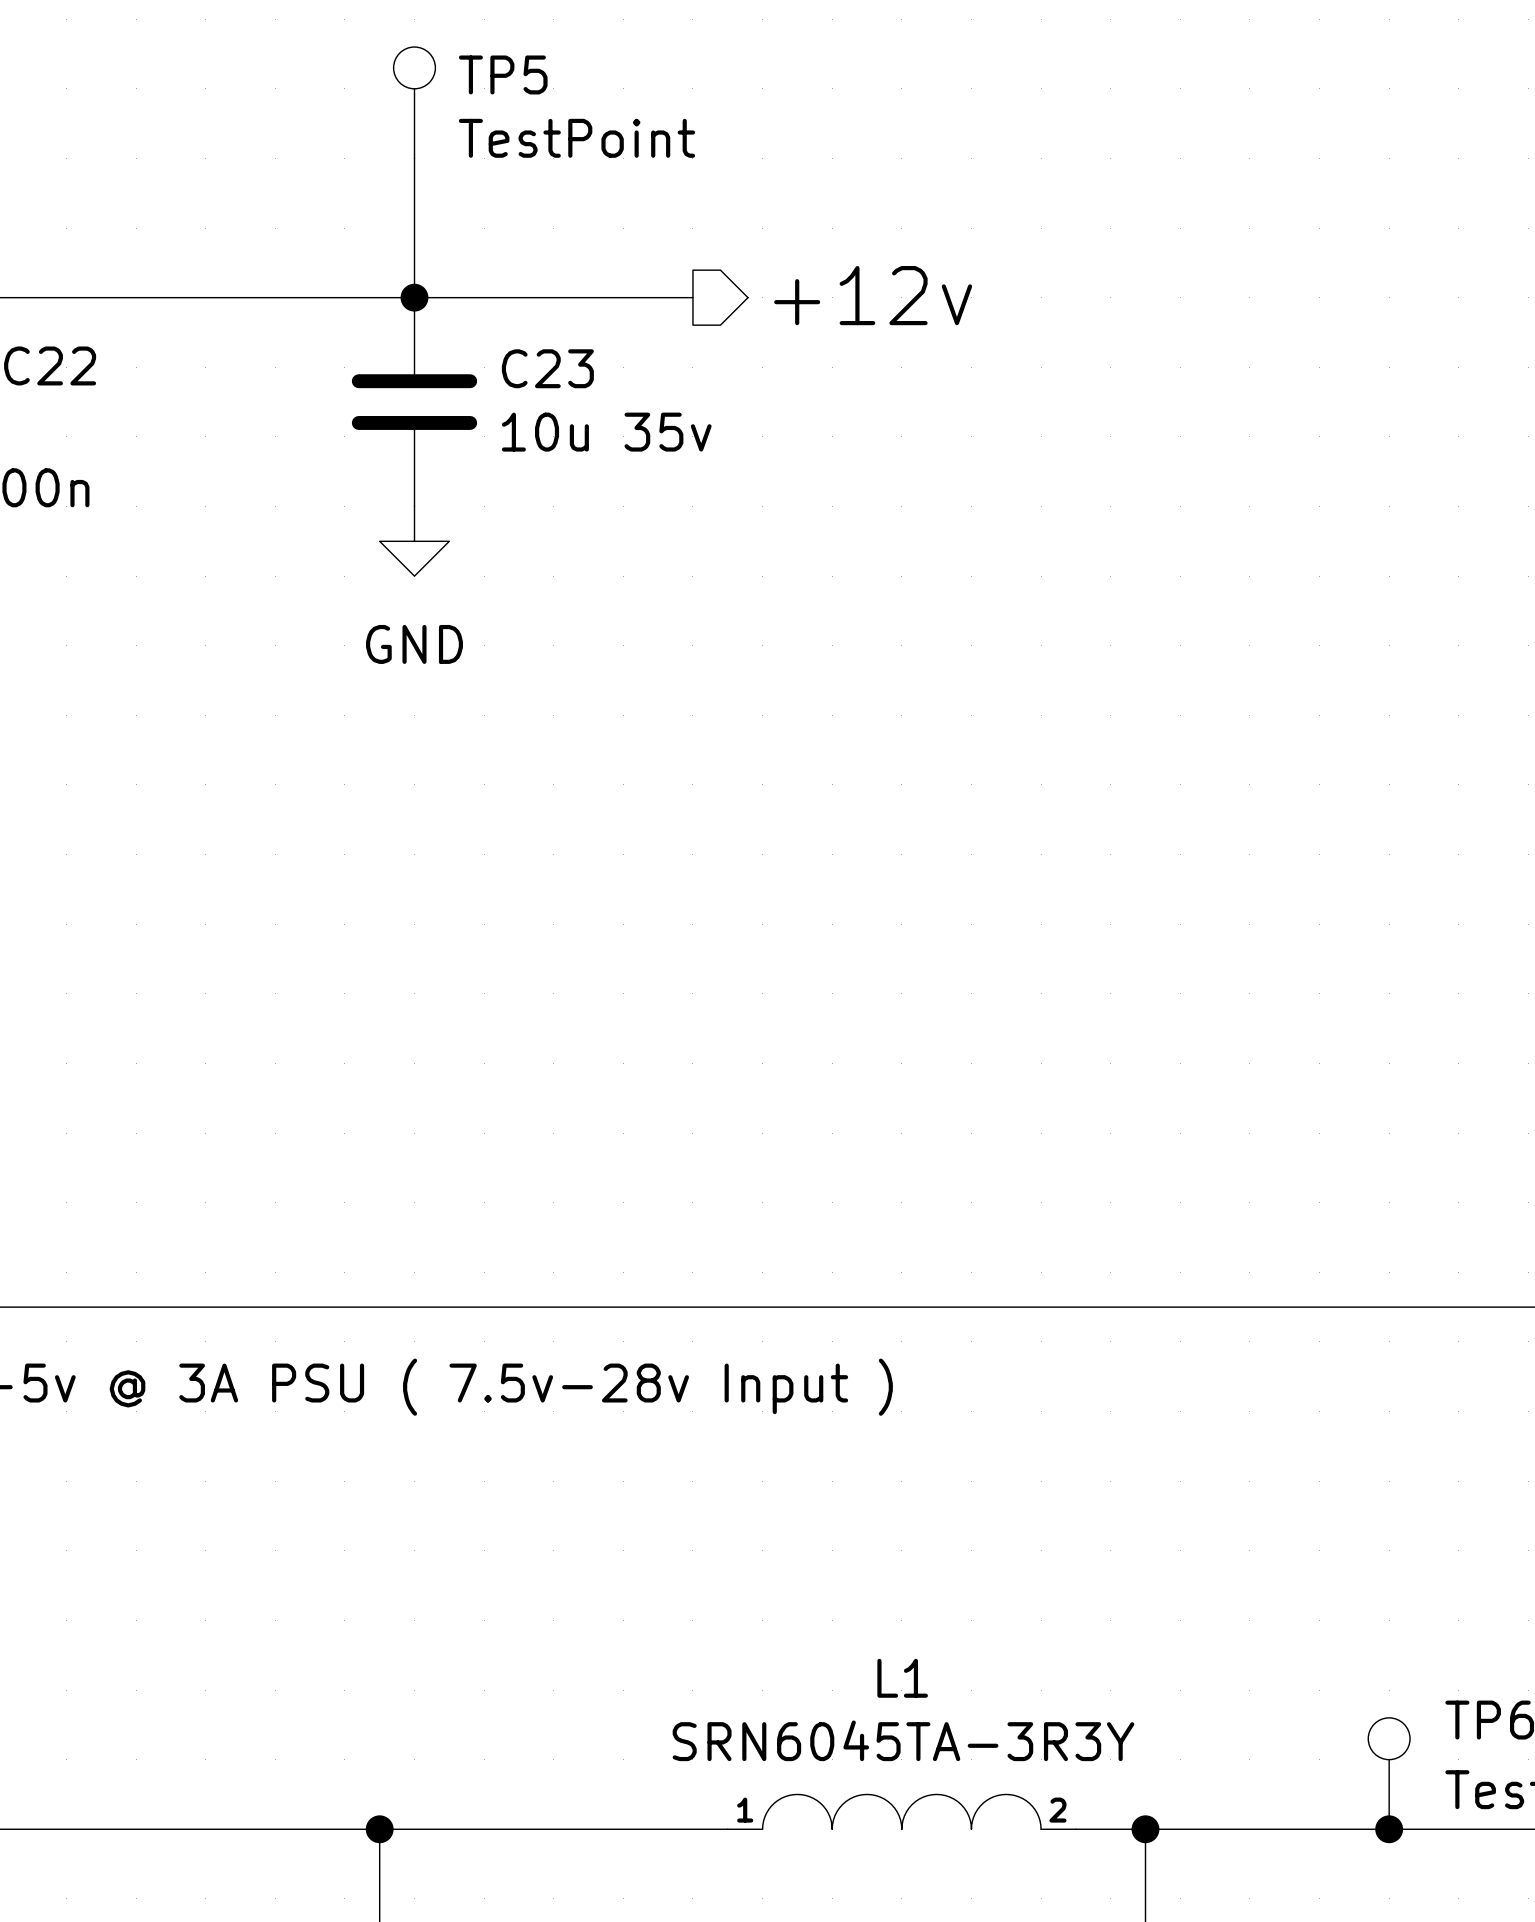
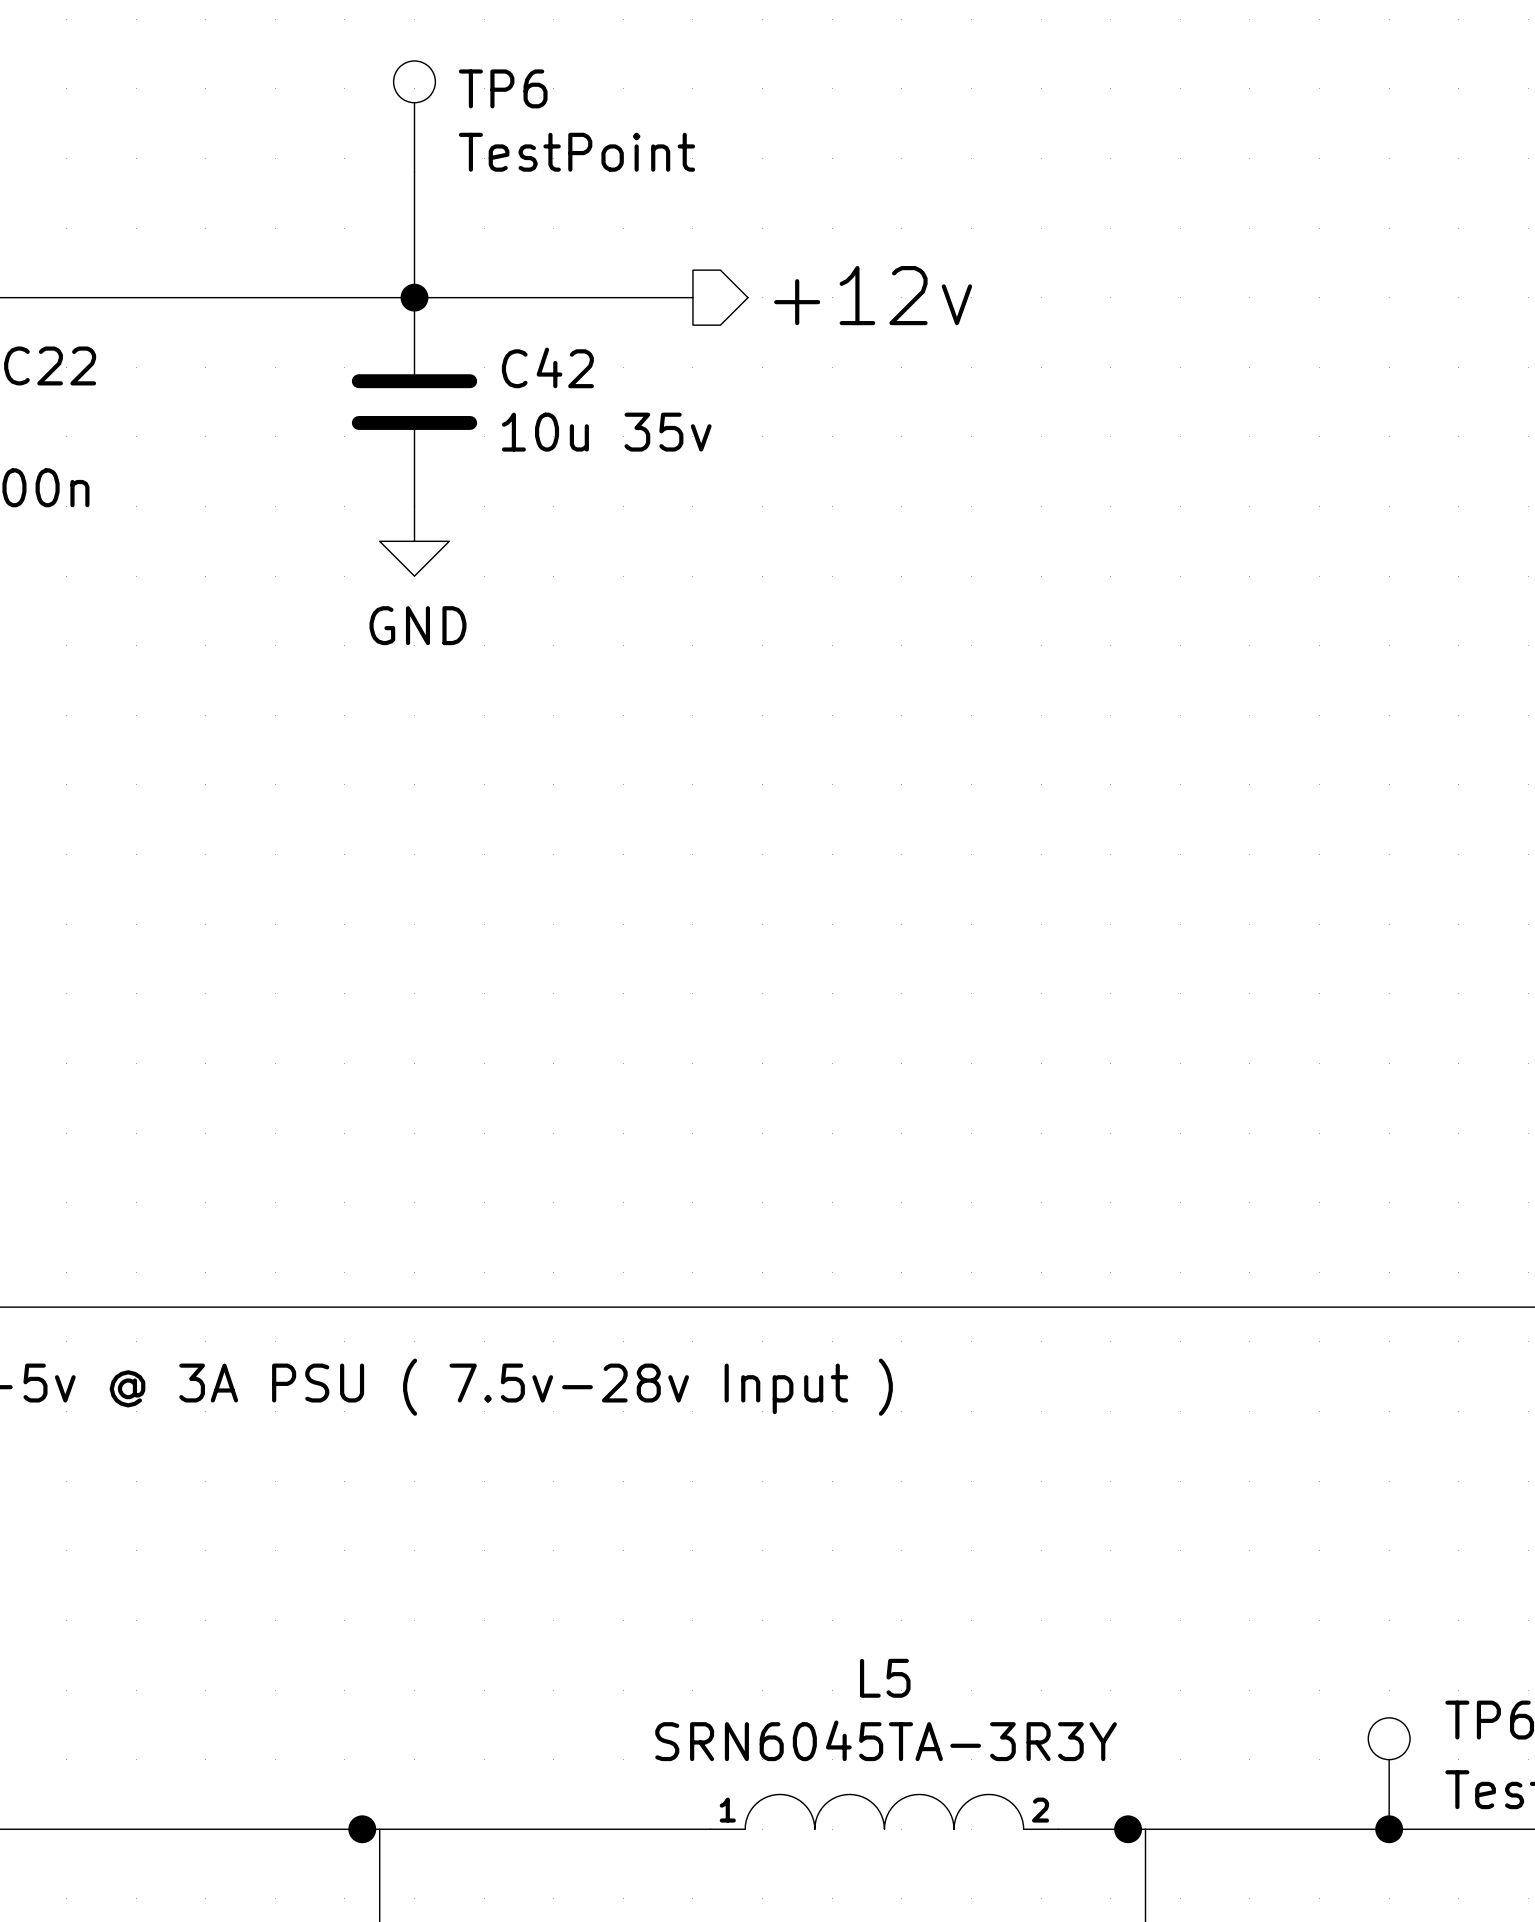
TP5 name: TP5 (503, 74) -> TP6 (503, 88)
TP5 position: (414, 102) -> (414, 116)
C23 name: C23 (547, 368) -> C42 (547, 367)
power symbol text position: GND (414, 644) -> GND (417, 625)
L1 name: L1 (902, 1678) -> L5 (885, 1678)
L1 position: (901, 1811) -> (884, 1811)
junction position: (379, 1829) -> (362, 1829)
junction position: (1145, 1829) -> (1128, 1829)

